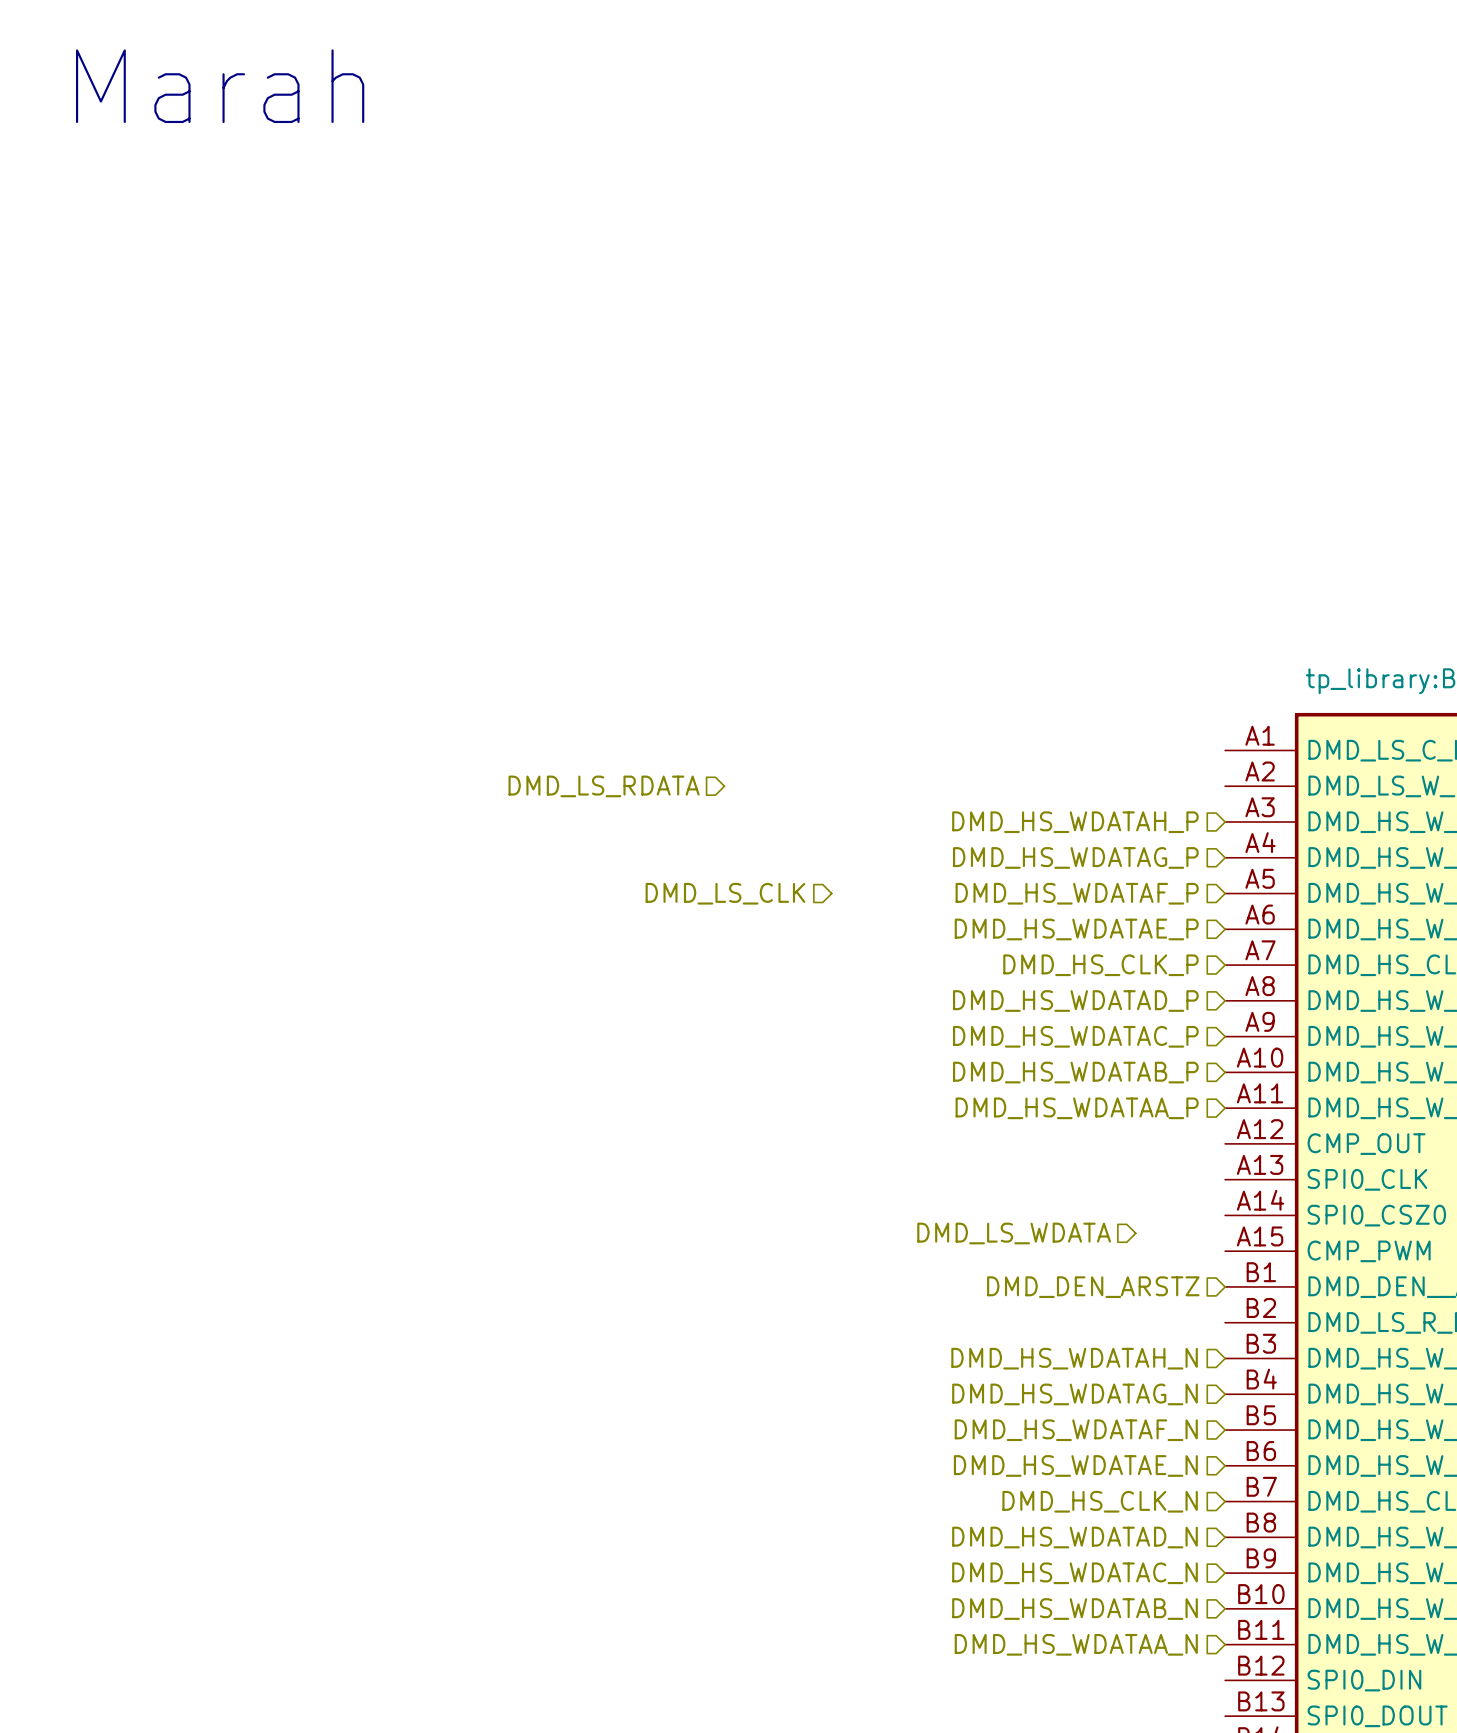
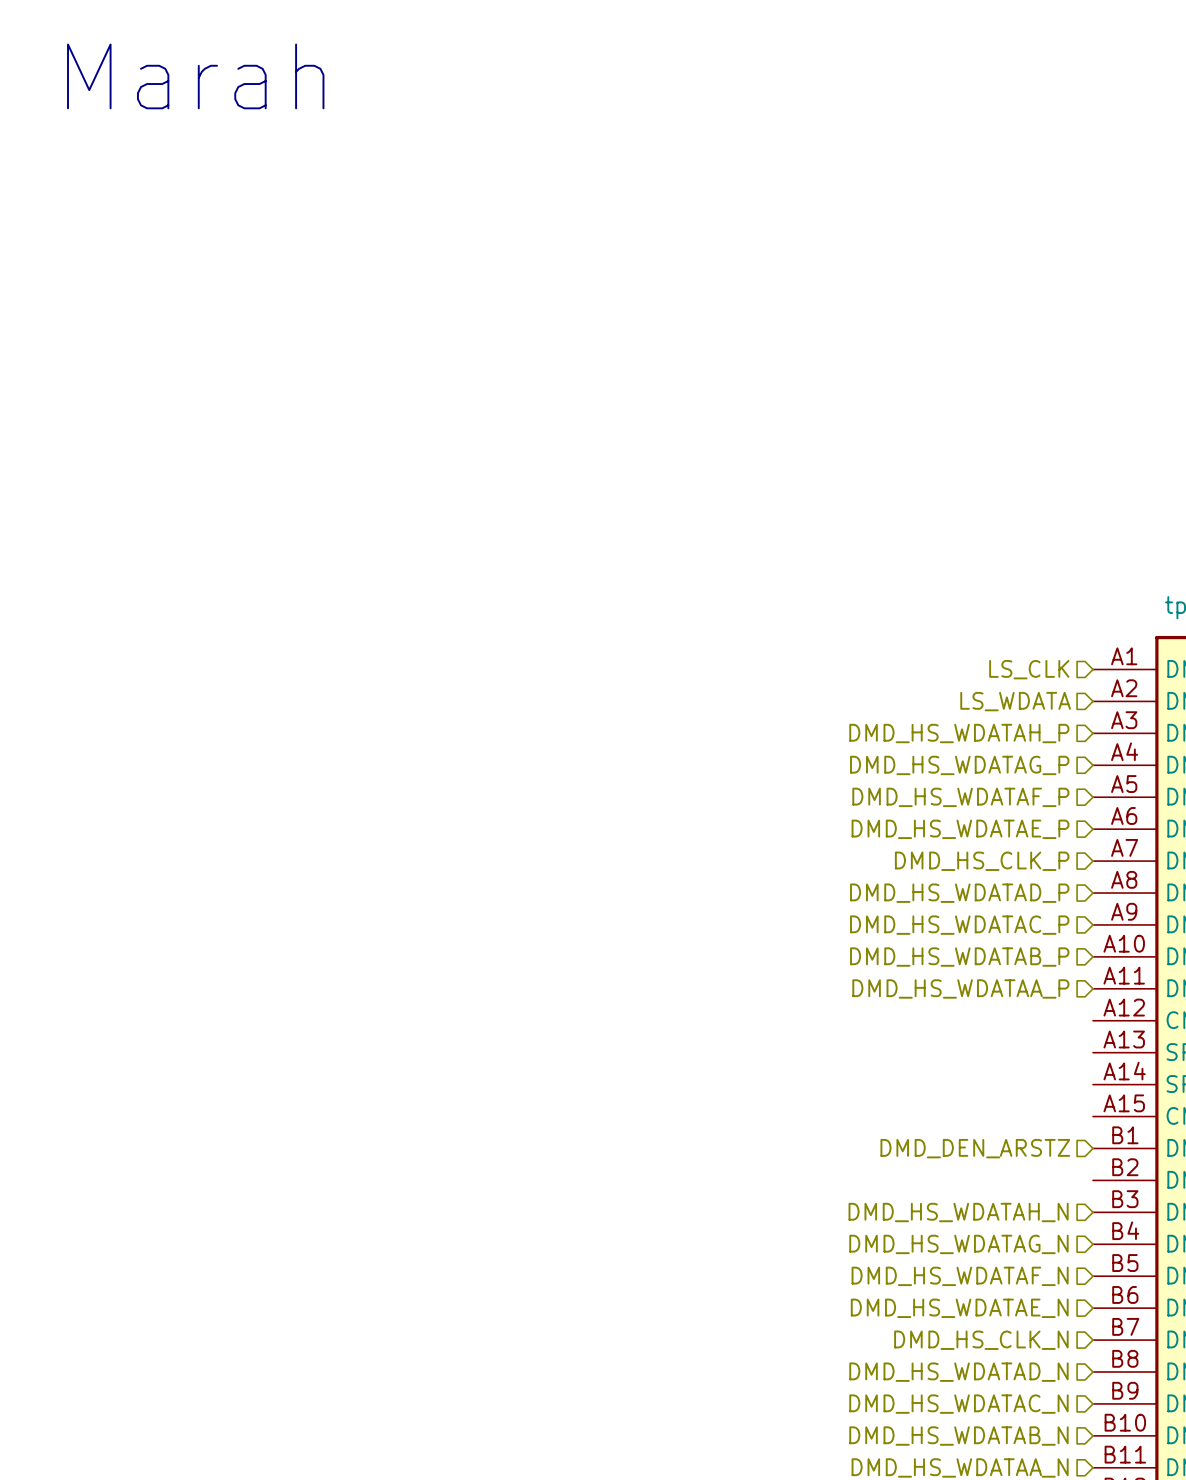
hierarchical label: none -> LS_CLK (1029, 669)
hierarchical label: DMD_LS_RDATA (604, 786) -> none
hierarchical label: none -> LS_WDATA (1015, 701)
hierarchical label: DMD_LS_CLK (725, 893) -> none
hierarchical label: DMD_LS_WDATA (1014, 1233) -> none

